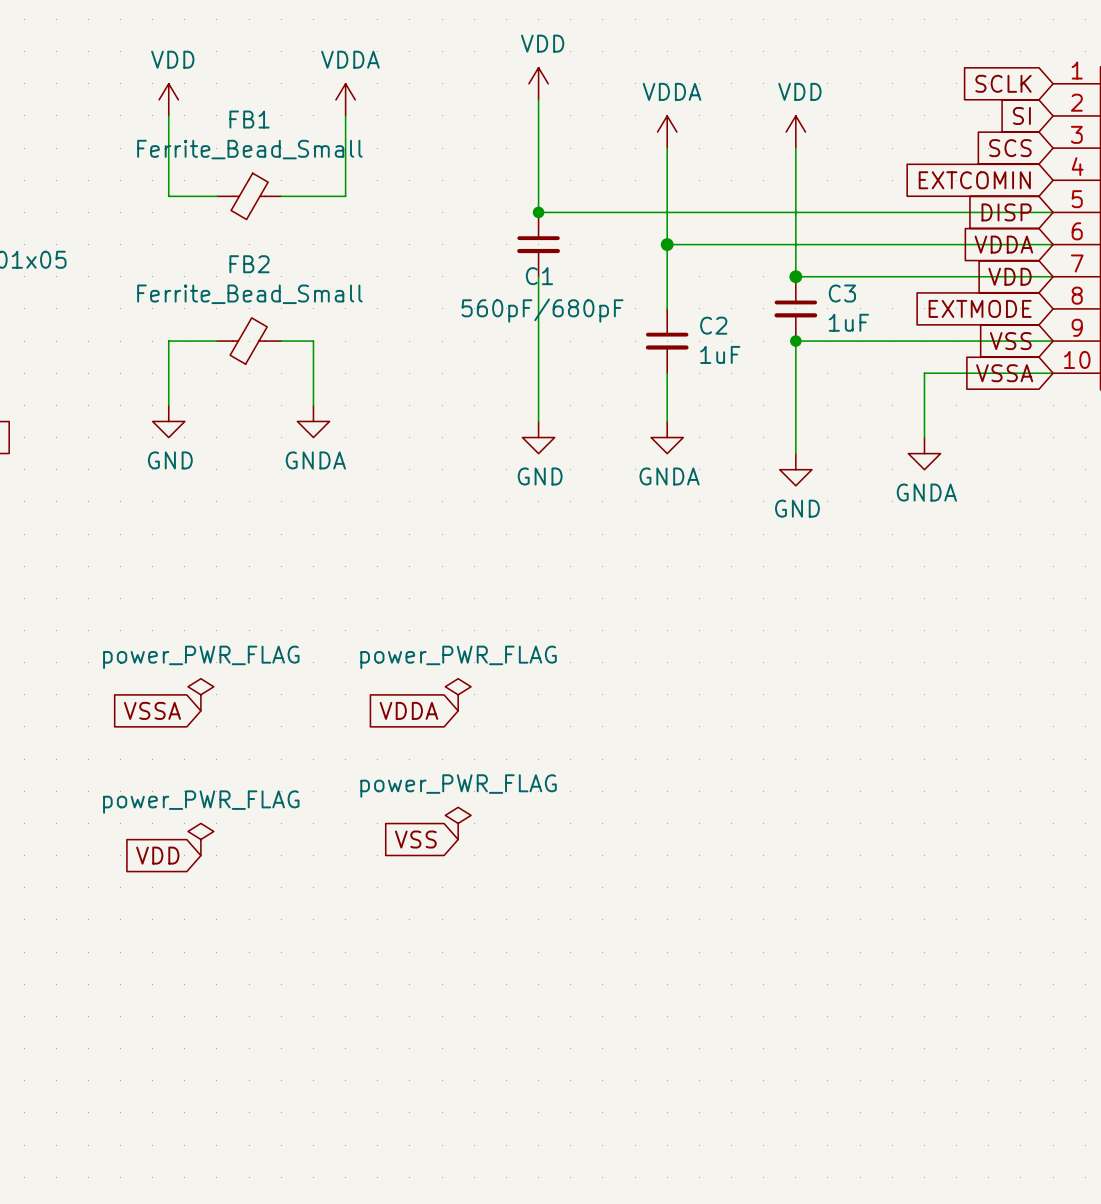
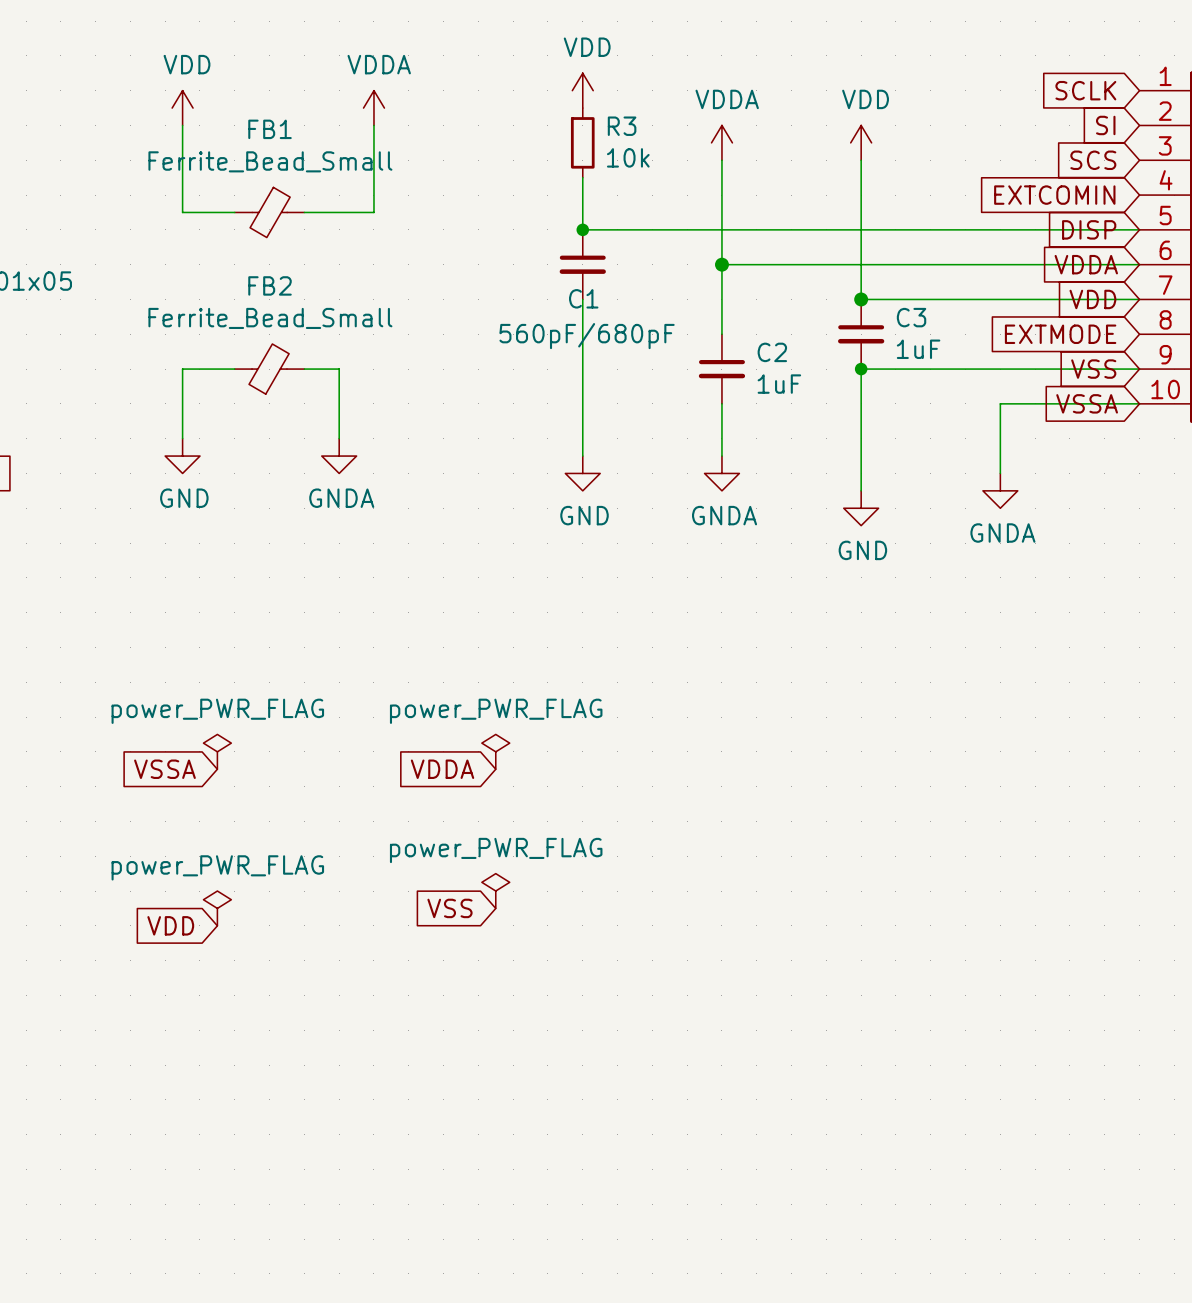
wire: (538, 99) (538, 164) -> none
R3: none -> 10k (582, 142)

